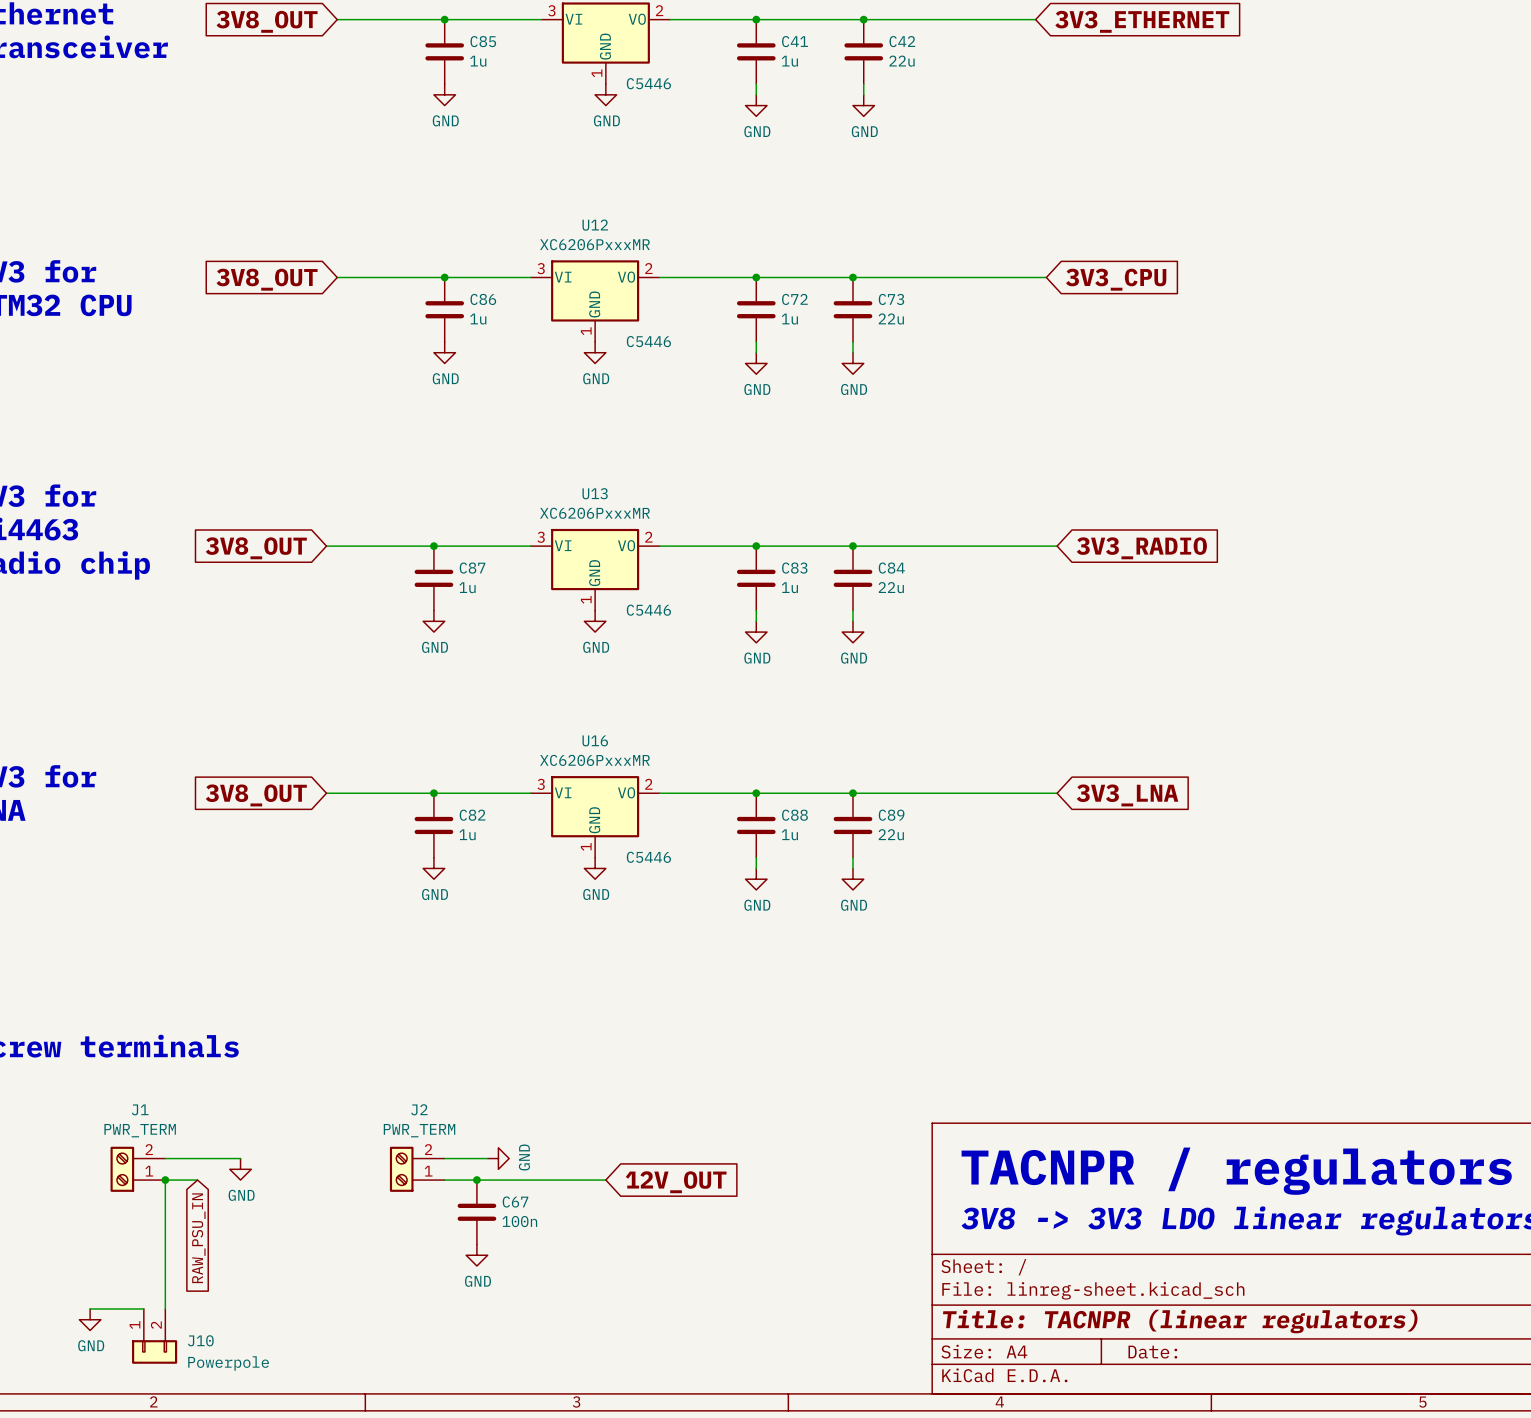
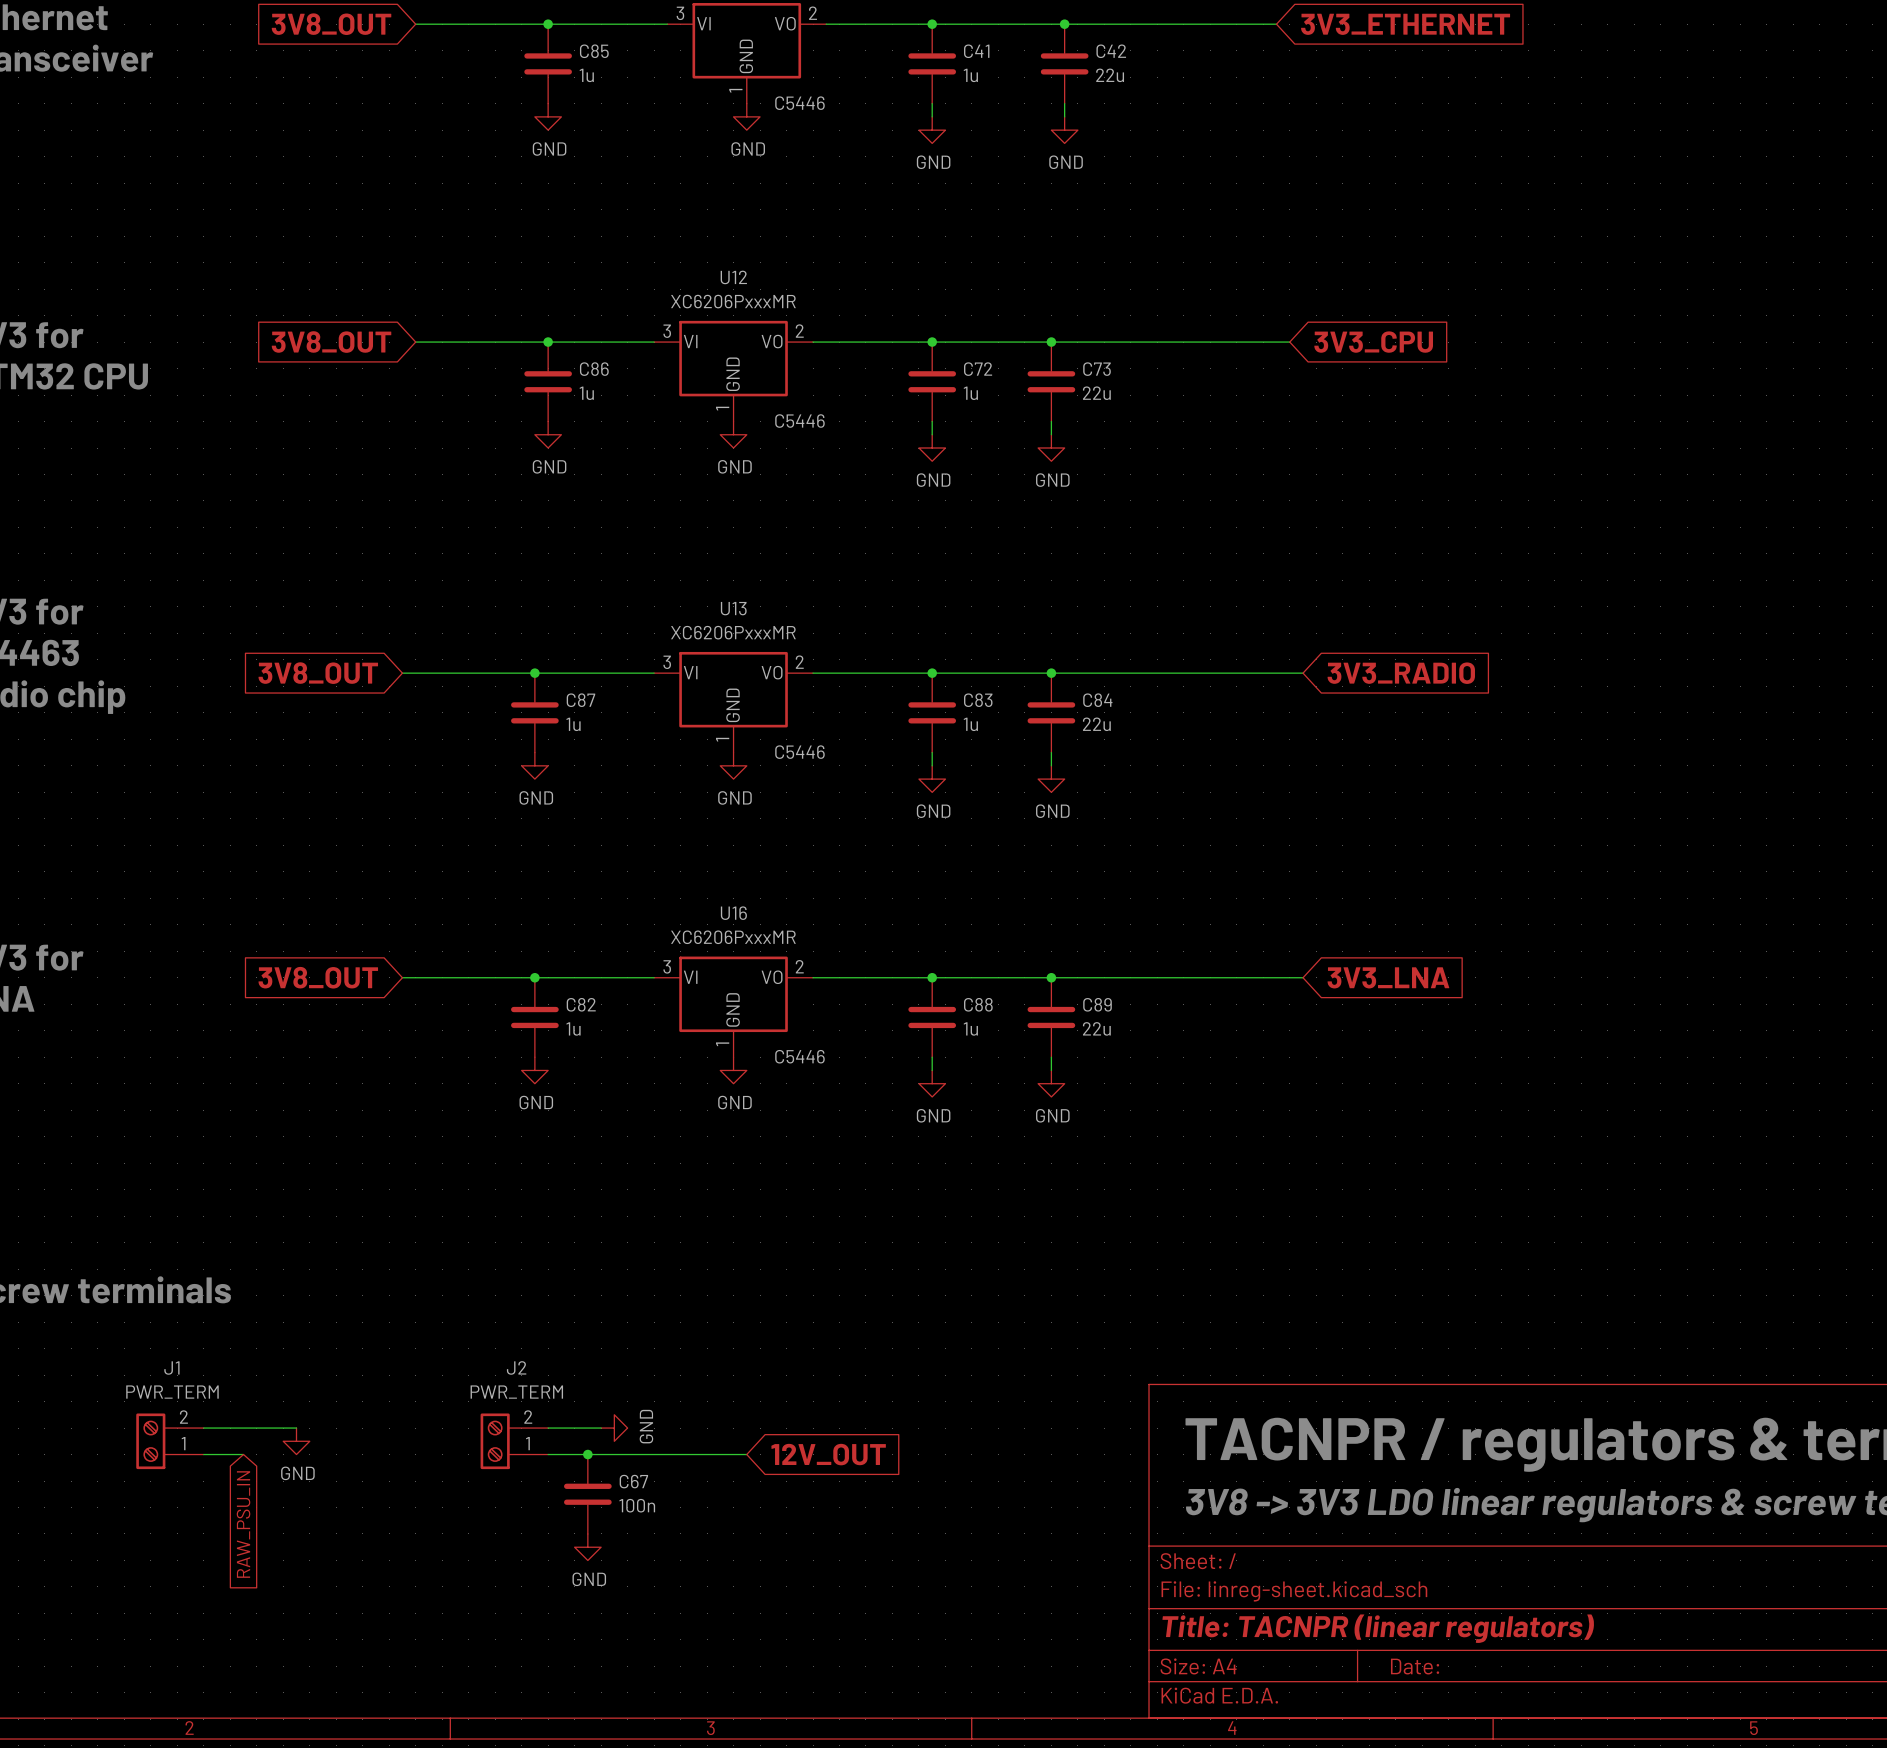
wire: (165, 1180) (165, 1308) -> none
junction: (165, 1180) -> none
wire: (90, 1308) (143, 1308) -> none
power symbol: GND (90, 1319) -> none
J10: Powerpole (154, 1336) -> none

